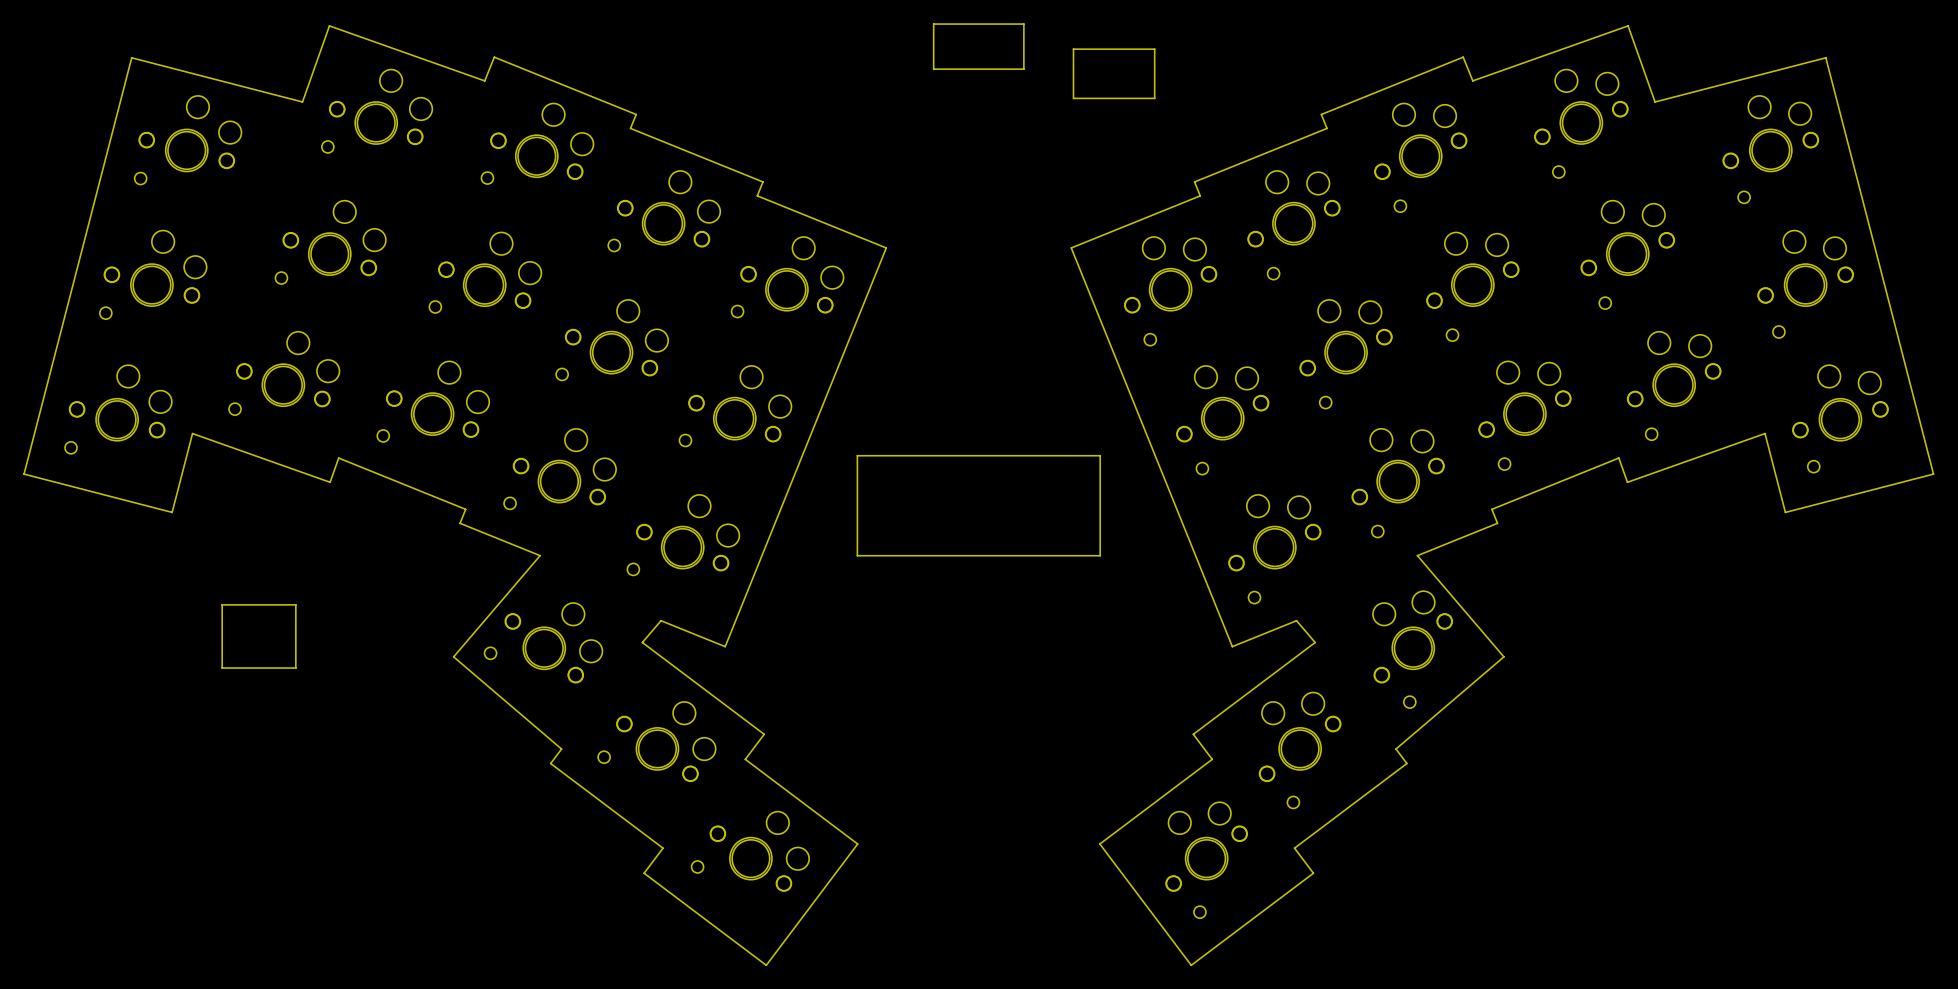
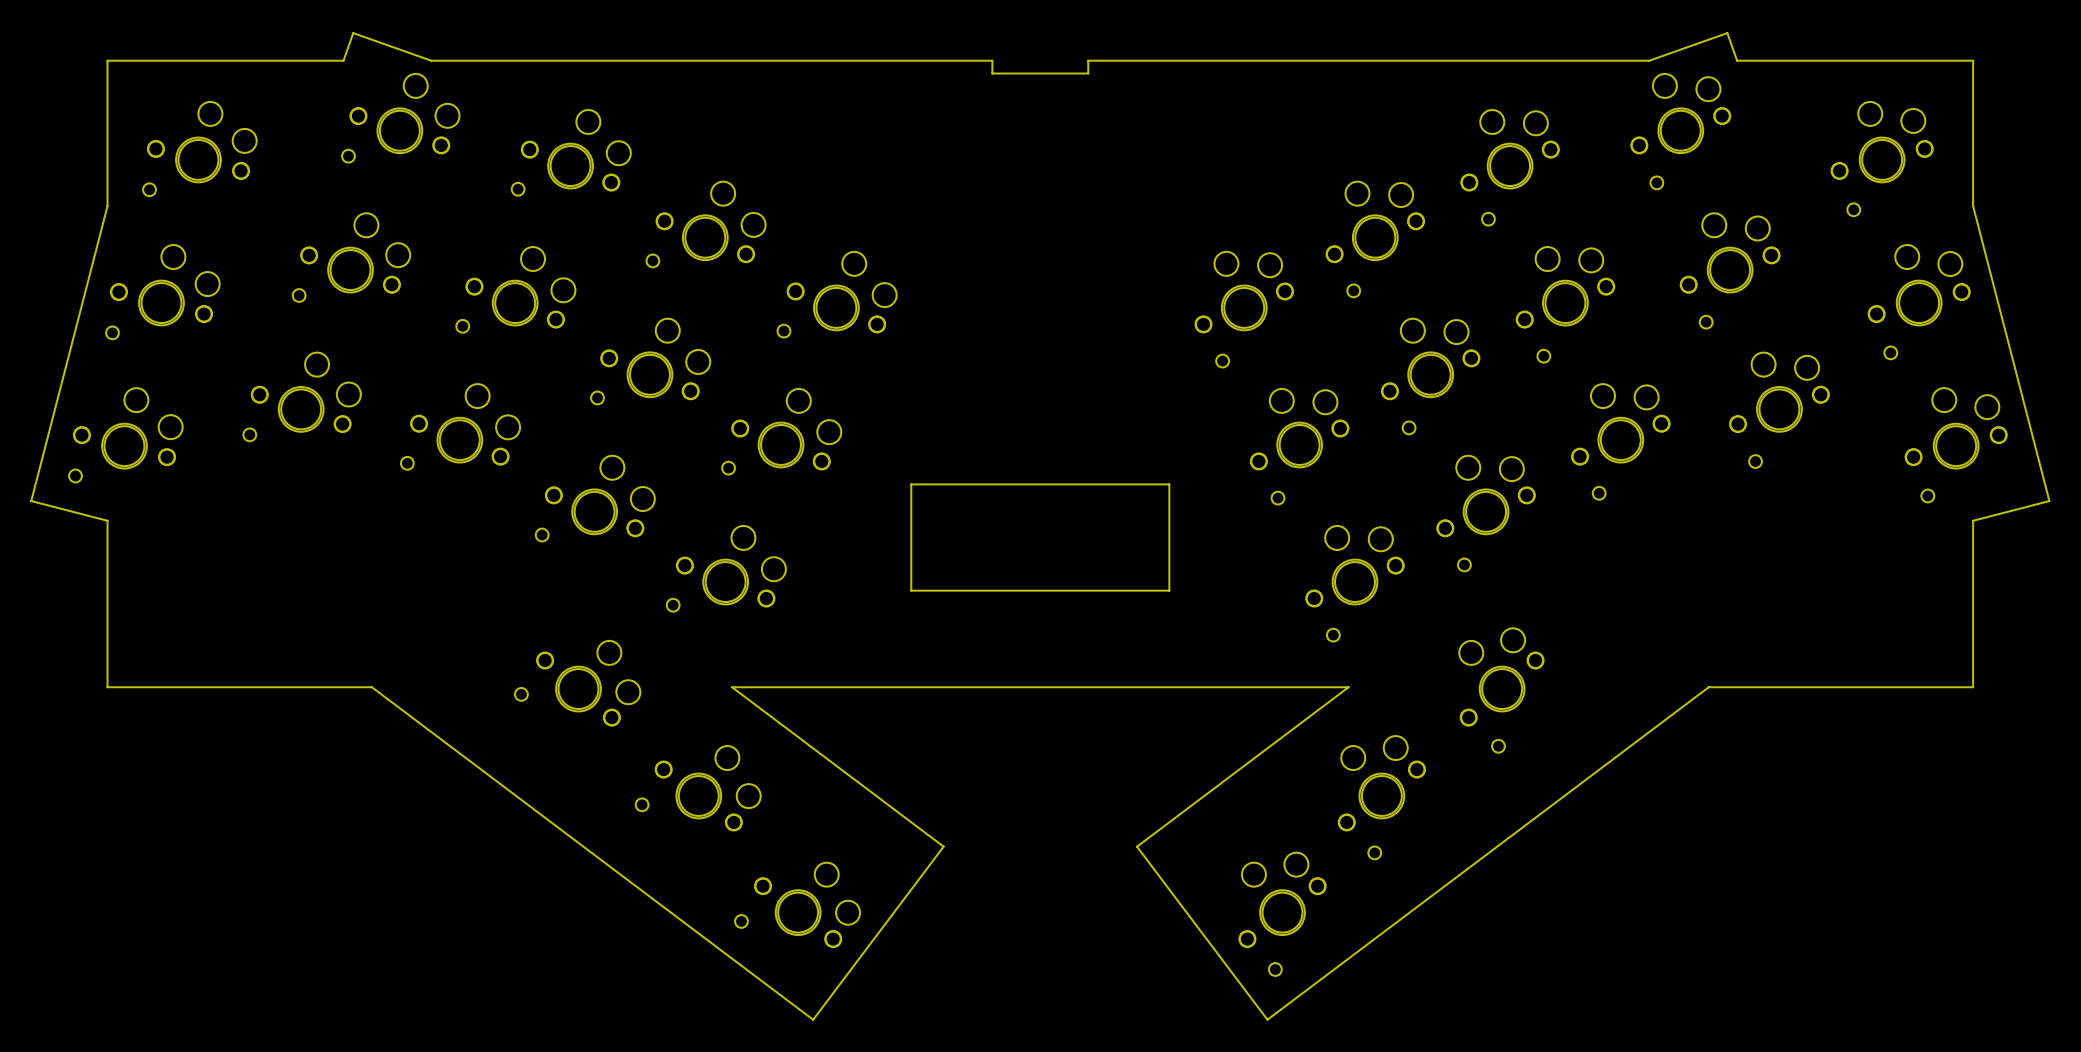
board edge: (329, 25) (484, 80) (494, 57) (636, 114) (630, 128) (762, 181) (757, 195) (886, 247) (725, 646) (661, 620) (642, 642) (764, 734) (745, 759) (857, 844) (766, 965) (644, 873) (663, 848) (550, 763) (561, 749) (453, 656) (540, 555) (460, 523) (465, 509) (338, 458) (330, 482) (192, 433) (172, 512) (24, 474) (131, 57) (302, 101) (329, 25) -> none
board edge: (1628, 25) (1655, 101) (1825, 57) (1933, 474) (1785, 512) (1765, 433) (1627, 482) (1618, 458) (1491, 509) (1497, 523) (1417, 555) (1503, 656) (1396, 749) (1406, 763) (1294, 848) (1313, 873) (1191, 965) (1099, 844) (1212, 759) (1193, 734) (1315, 642) (1296, 620) (1232, 646) (1071, 247) (1200, 195) (1194, 181) (1327, 128) (1321, 114) (1463, 57) (1472, 80) (1628, 25) -> none
board edge: (1073, 49) (1154, 49) (1154, 98) (1073, 98) (1073, 49) -> none
board edge: (933, 57) (933, 24) (1023, 24) (1023, 57) -> (992, 60) (431, 60) (353, 33) (343, 60) (107, 60) (107, 206) (31, 501) (107, 520) (107, 687) (371, 687) (813, 1019) (943, 846) (732, 687) (1348, 687) (1137, 846) (1267, 1019) (1708, 687) (1973, 687) (1973, 520) (2049, 501) (1973, 206) (1973, 60) (1737, 60) (1727, 33) (1649, 60) (1088, 60)
board edge: (222, 604) (295, 604) (295, 668) (222, 668) (222, 604) -> none

